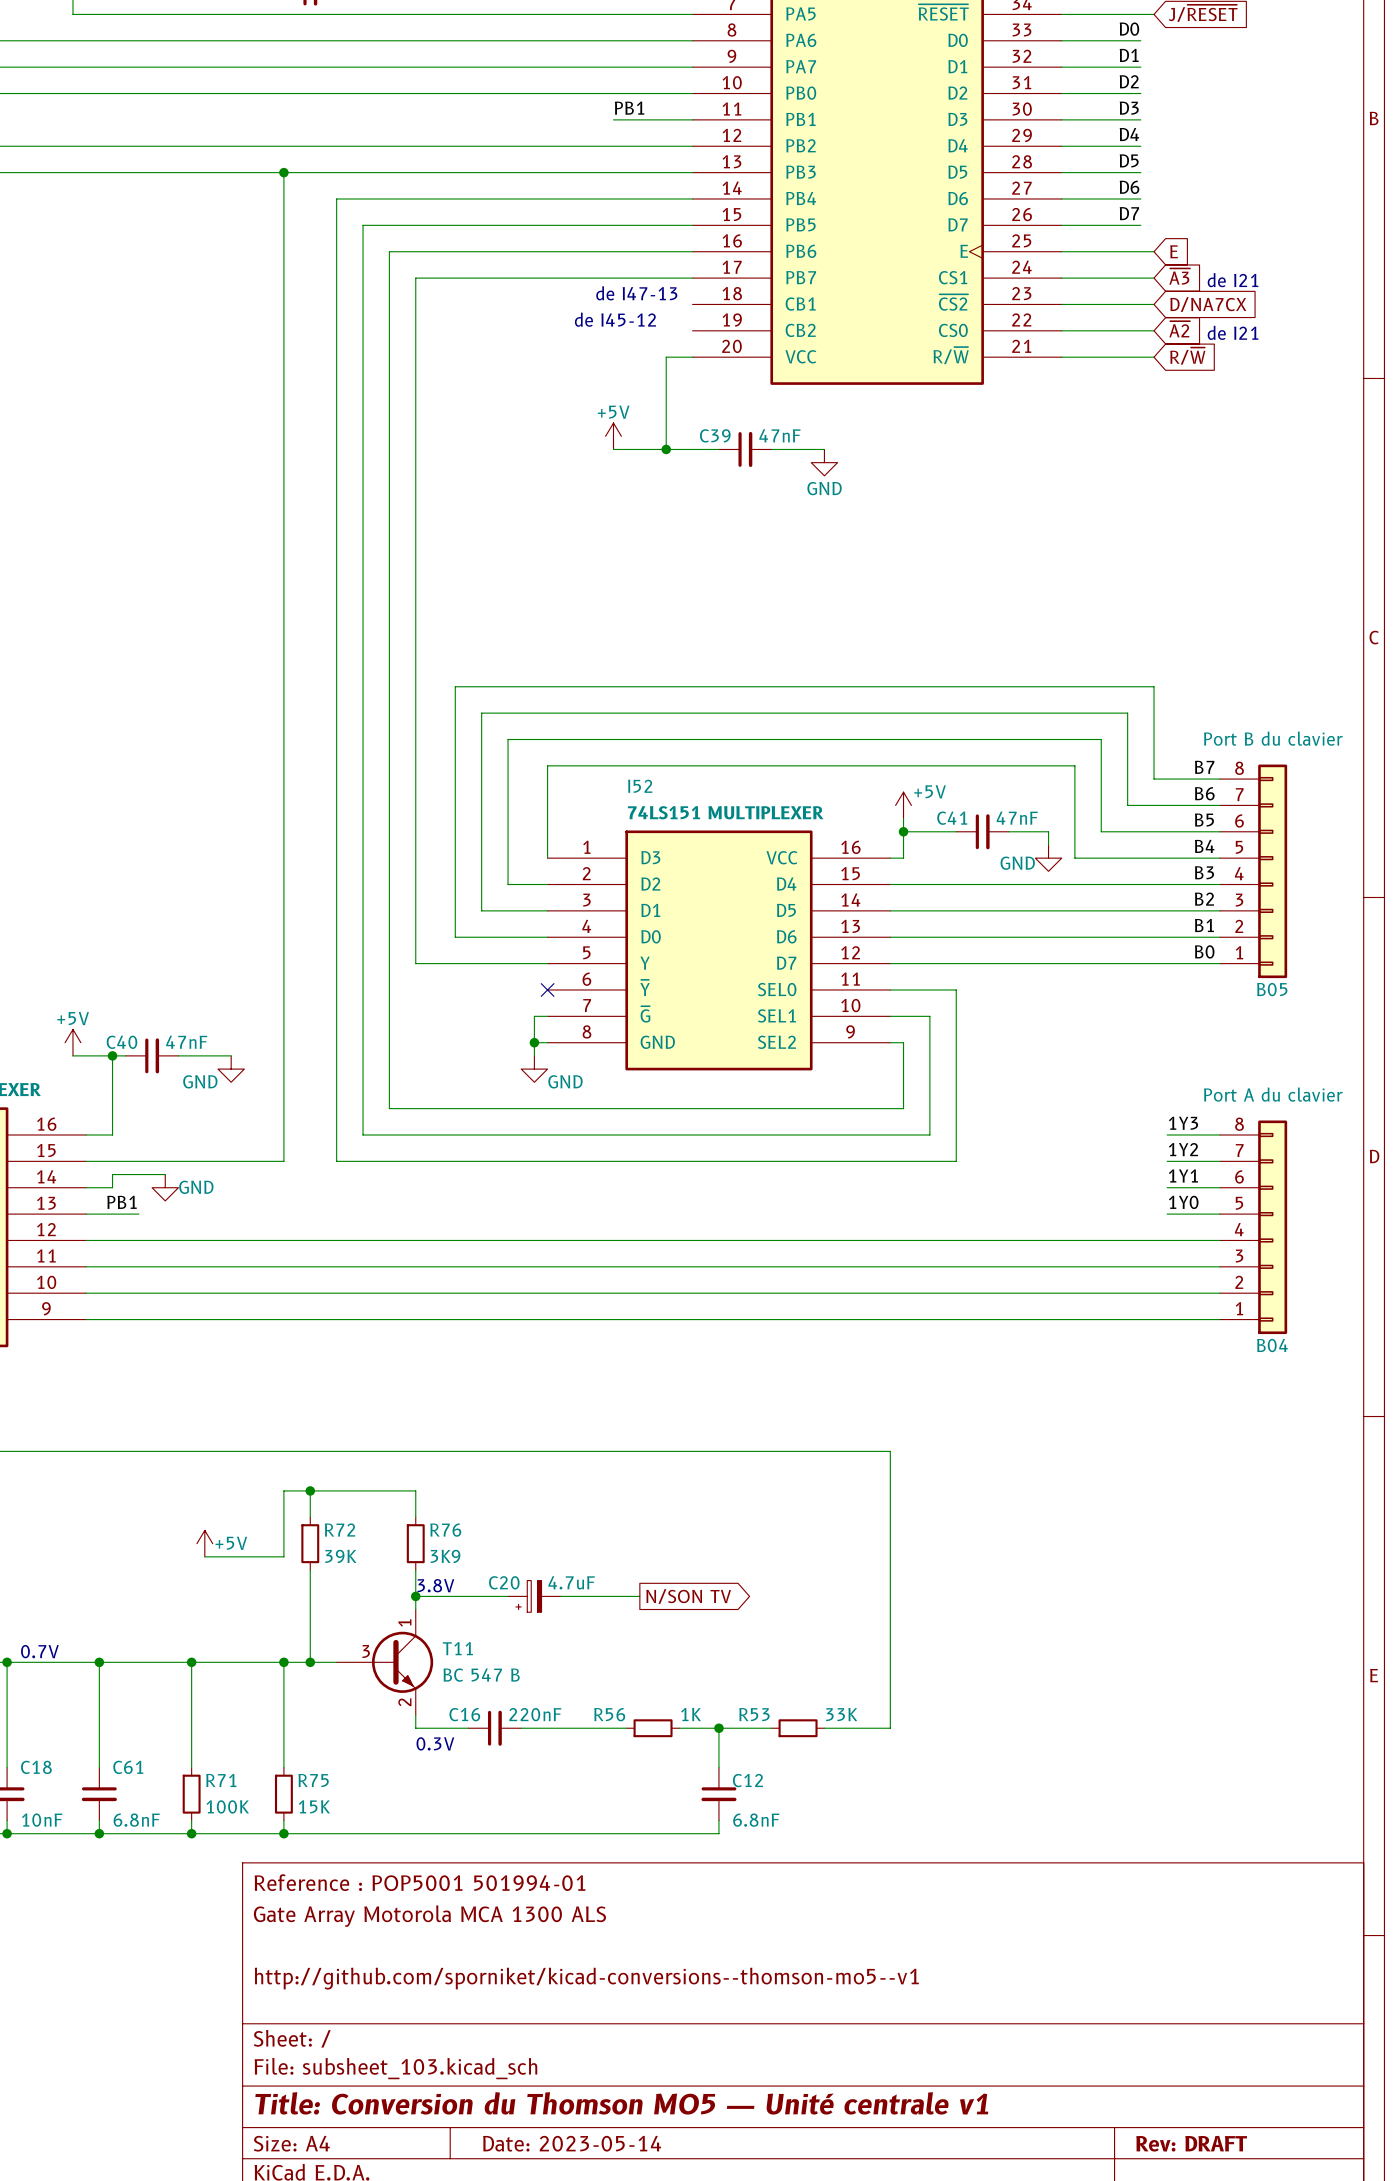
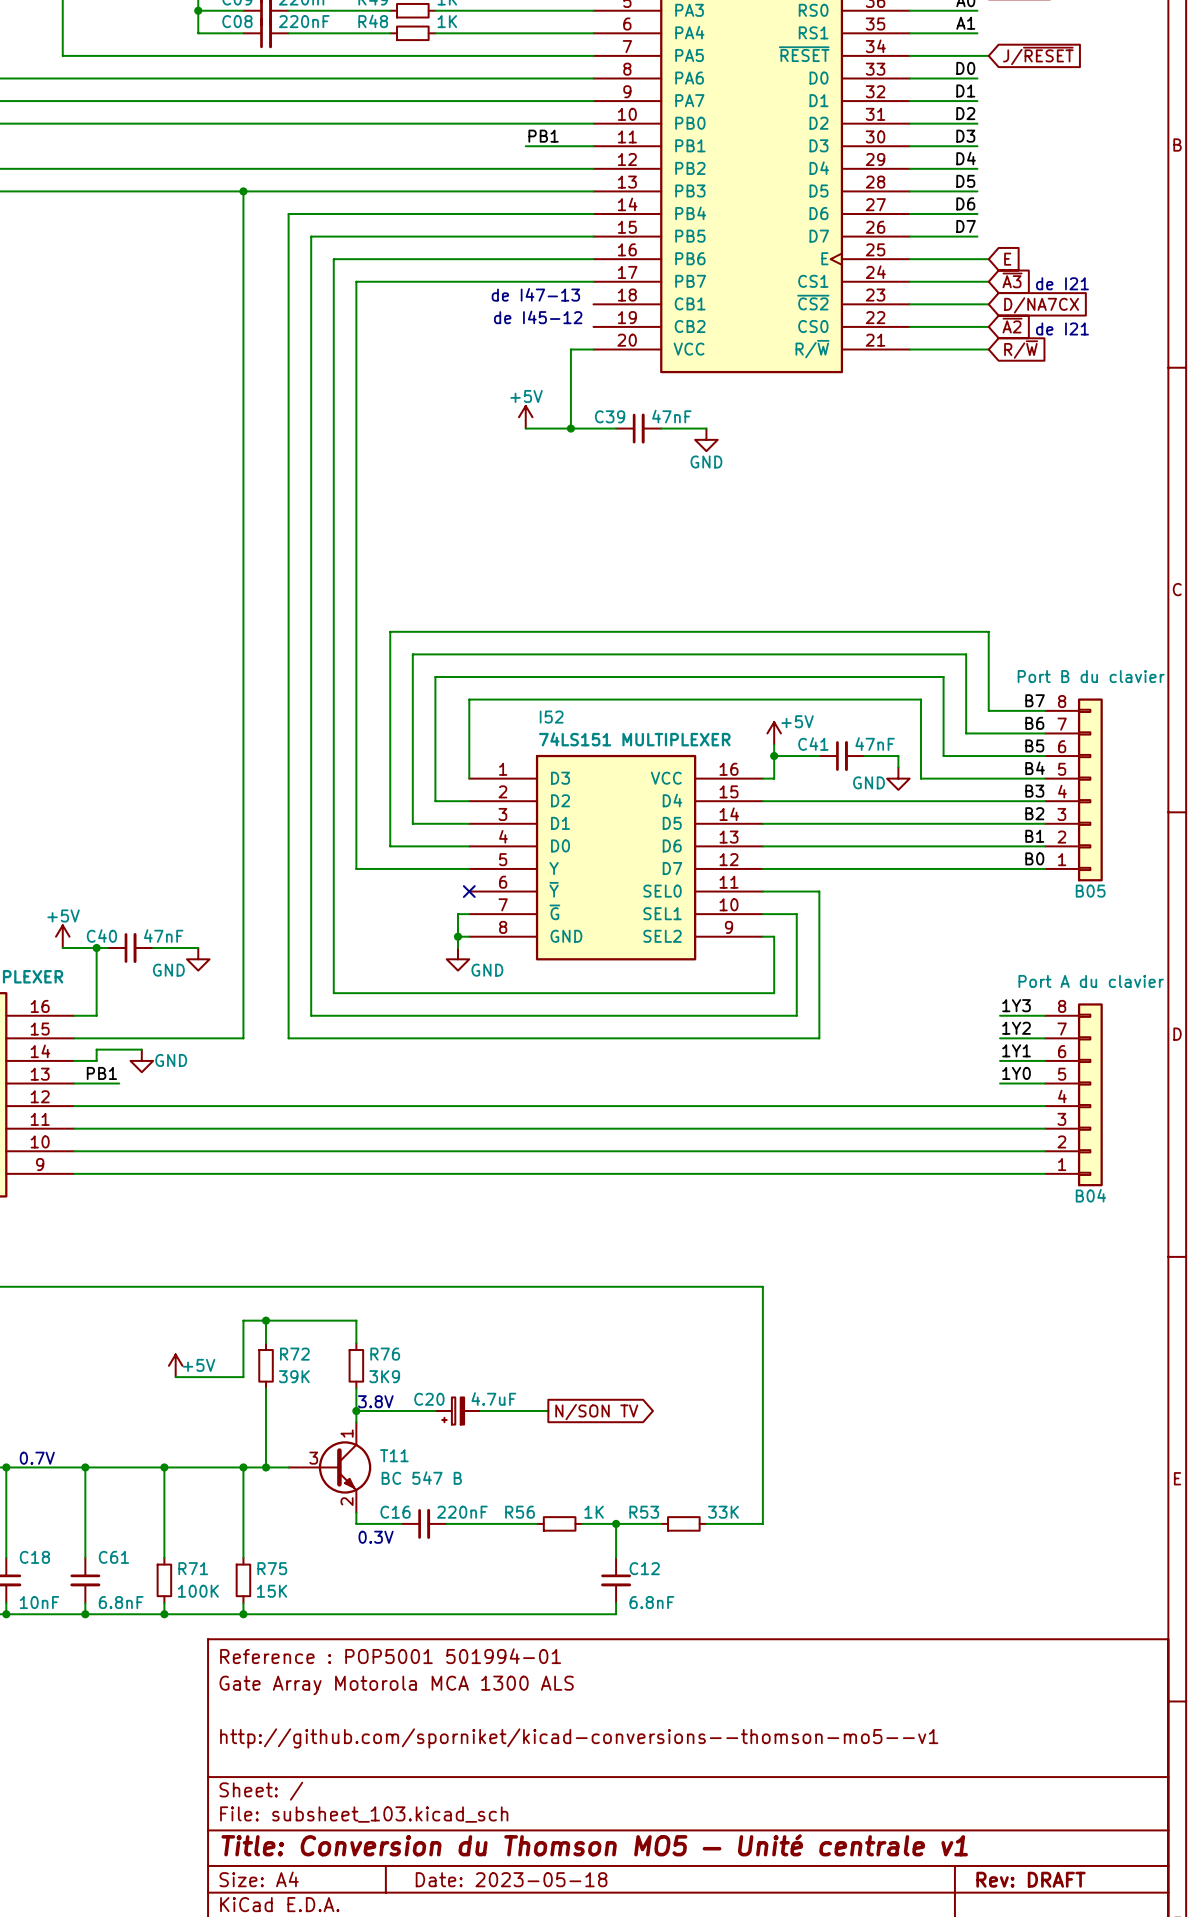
title block: Date: 2023-05-14 (572, 2143) -> Date: 2023-05-18 (511, 1879)

